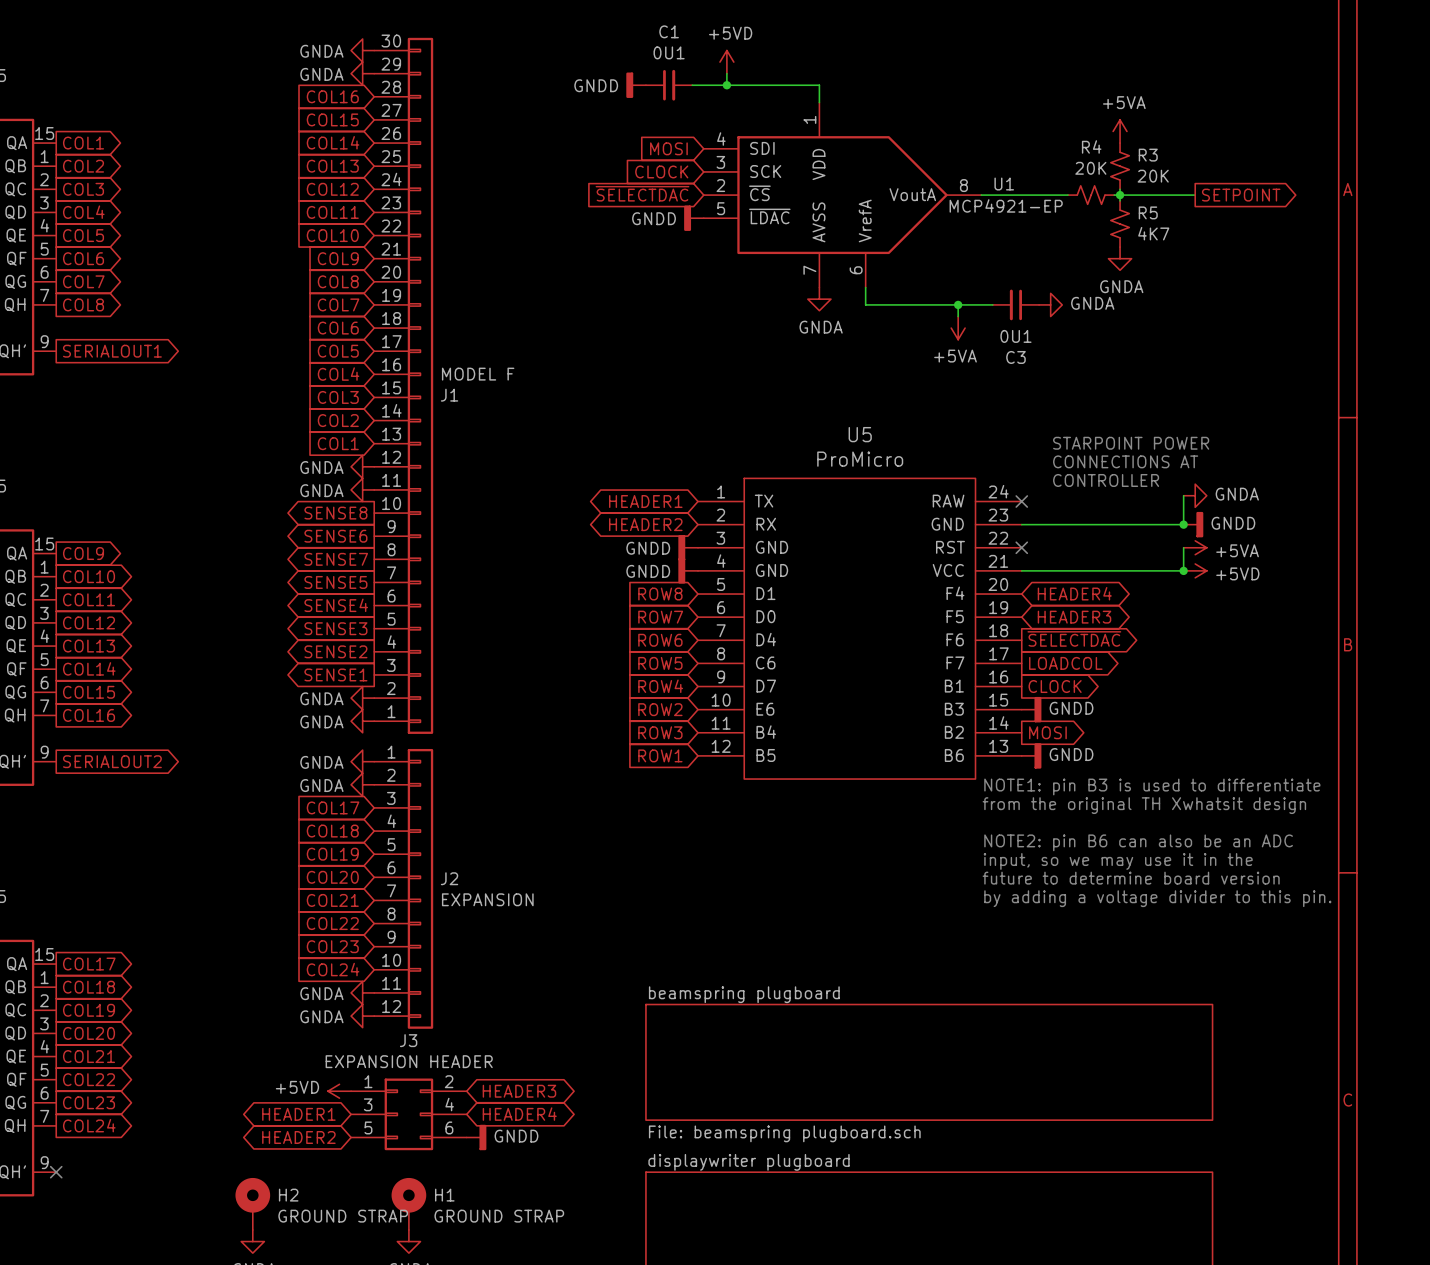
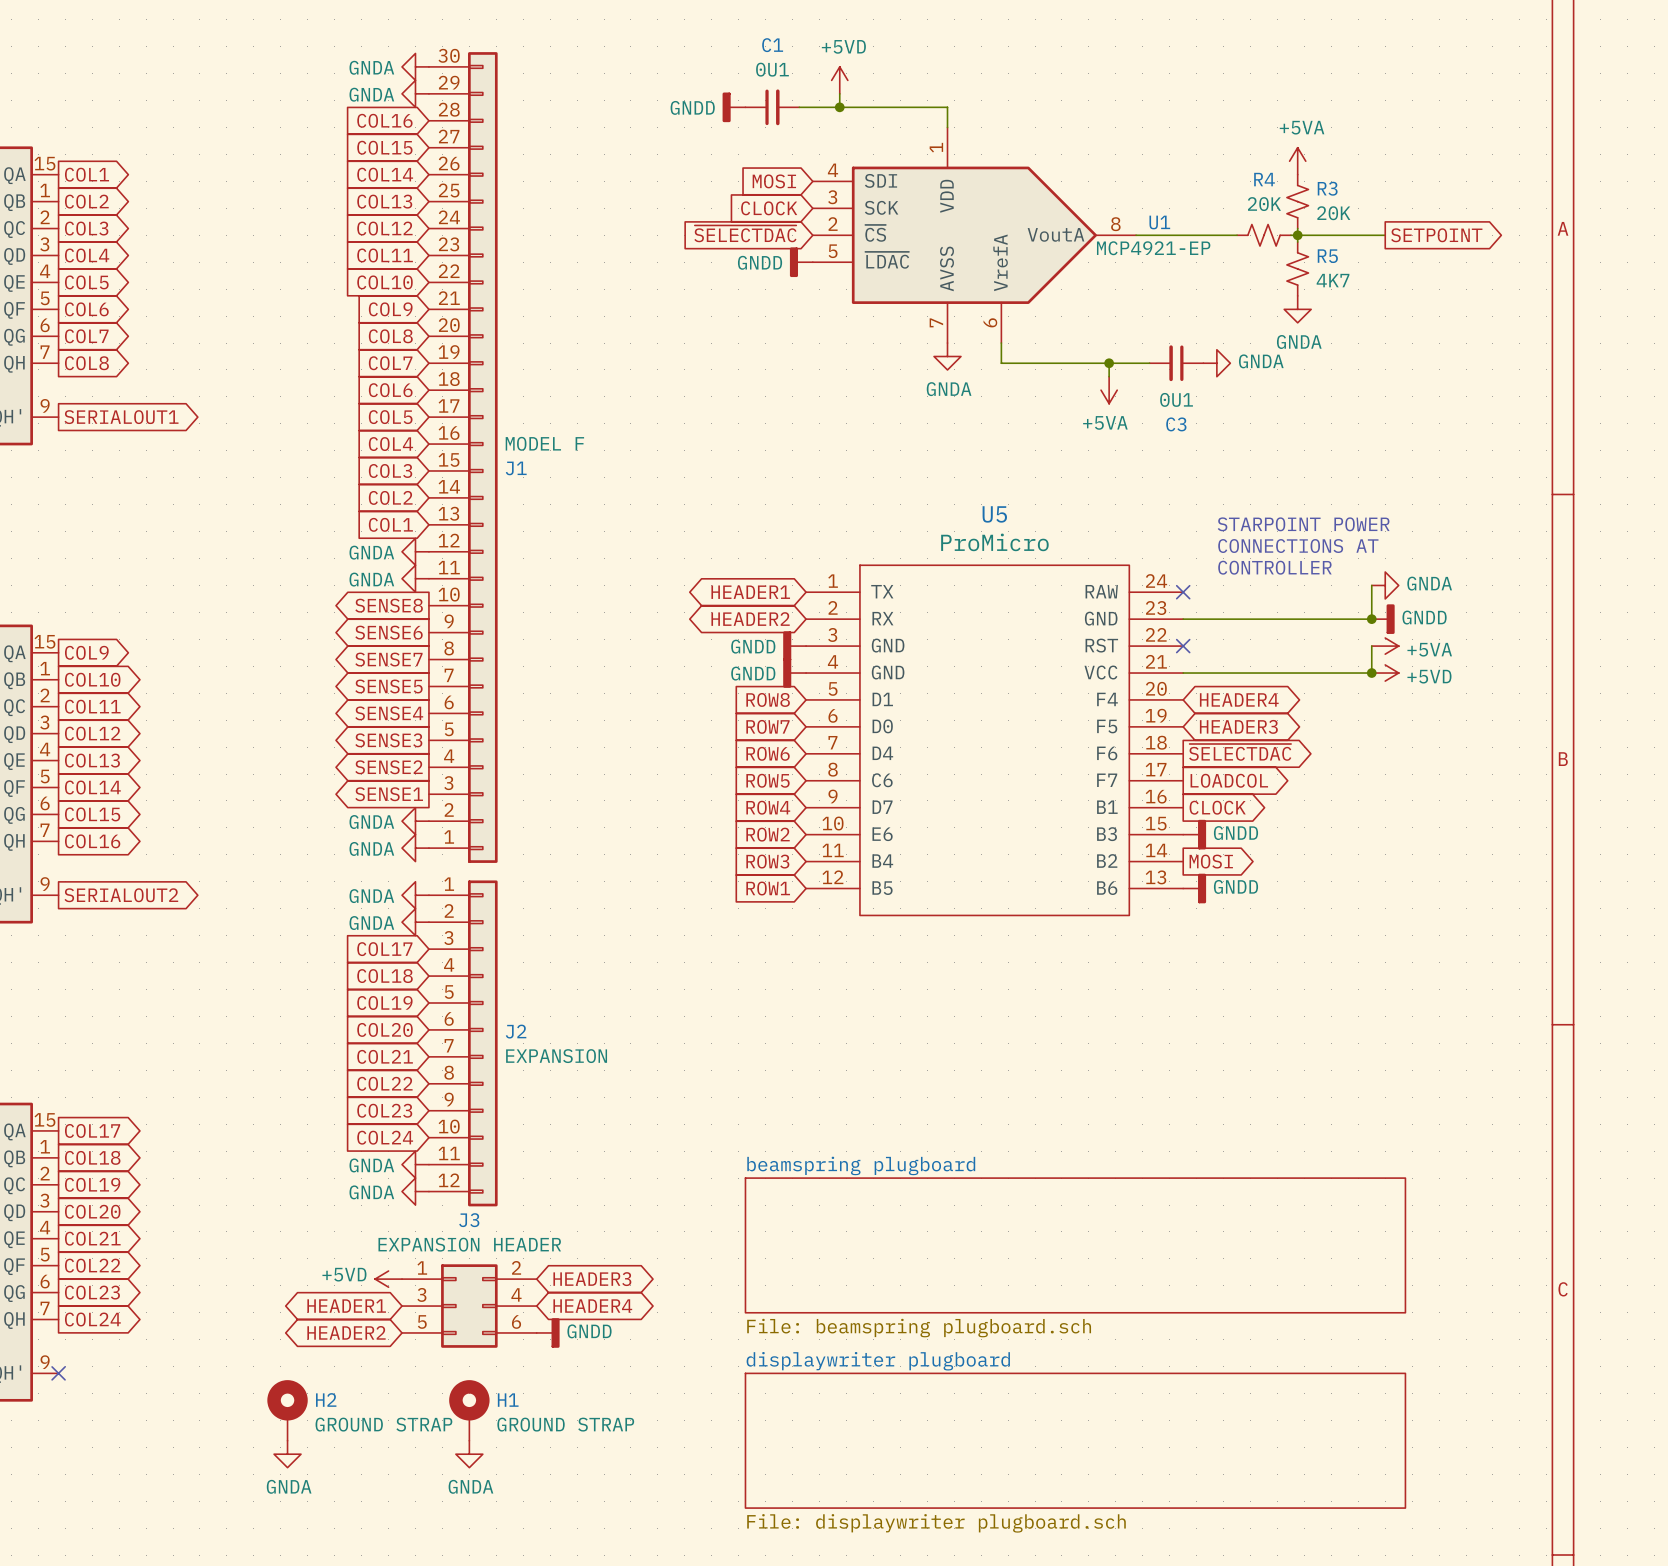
text: NOTE1: pin B3 is used to differentiate (1152, 786) -> none
text: from the original TH Xwhatsit design (1144, 805) -> none
text: NOTE2: pin B6 can also be an ADC (1138, 842) -> none
text: input, so we may use it in the (1118, 861) -> none
text: future to determine board version (1131, 878) -> none
text: by adding a voltage divider to this pin. (1157, 898) -> none

